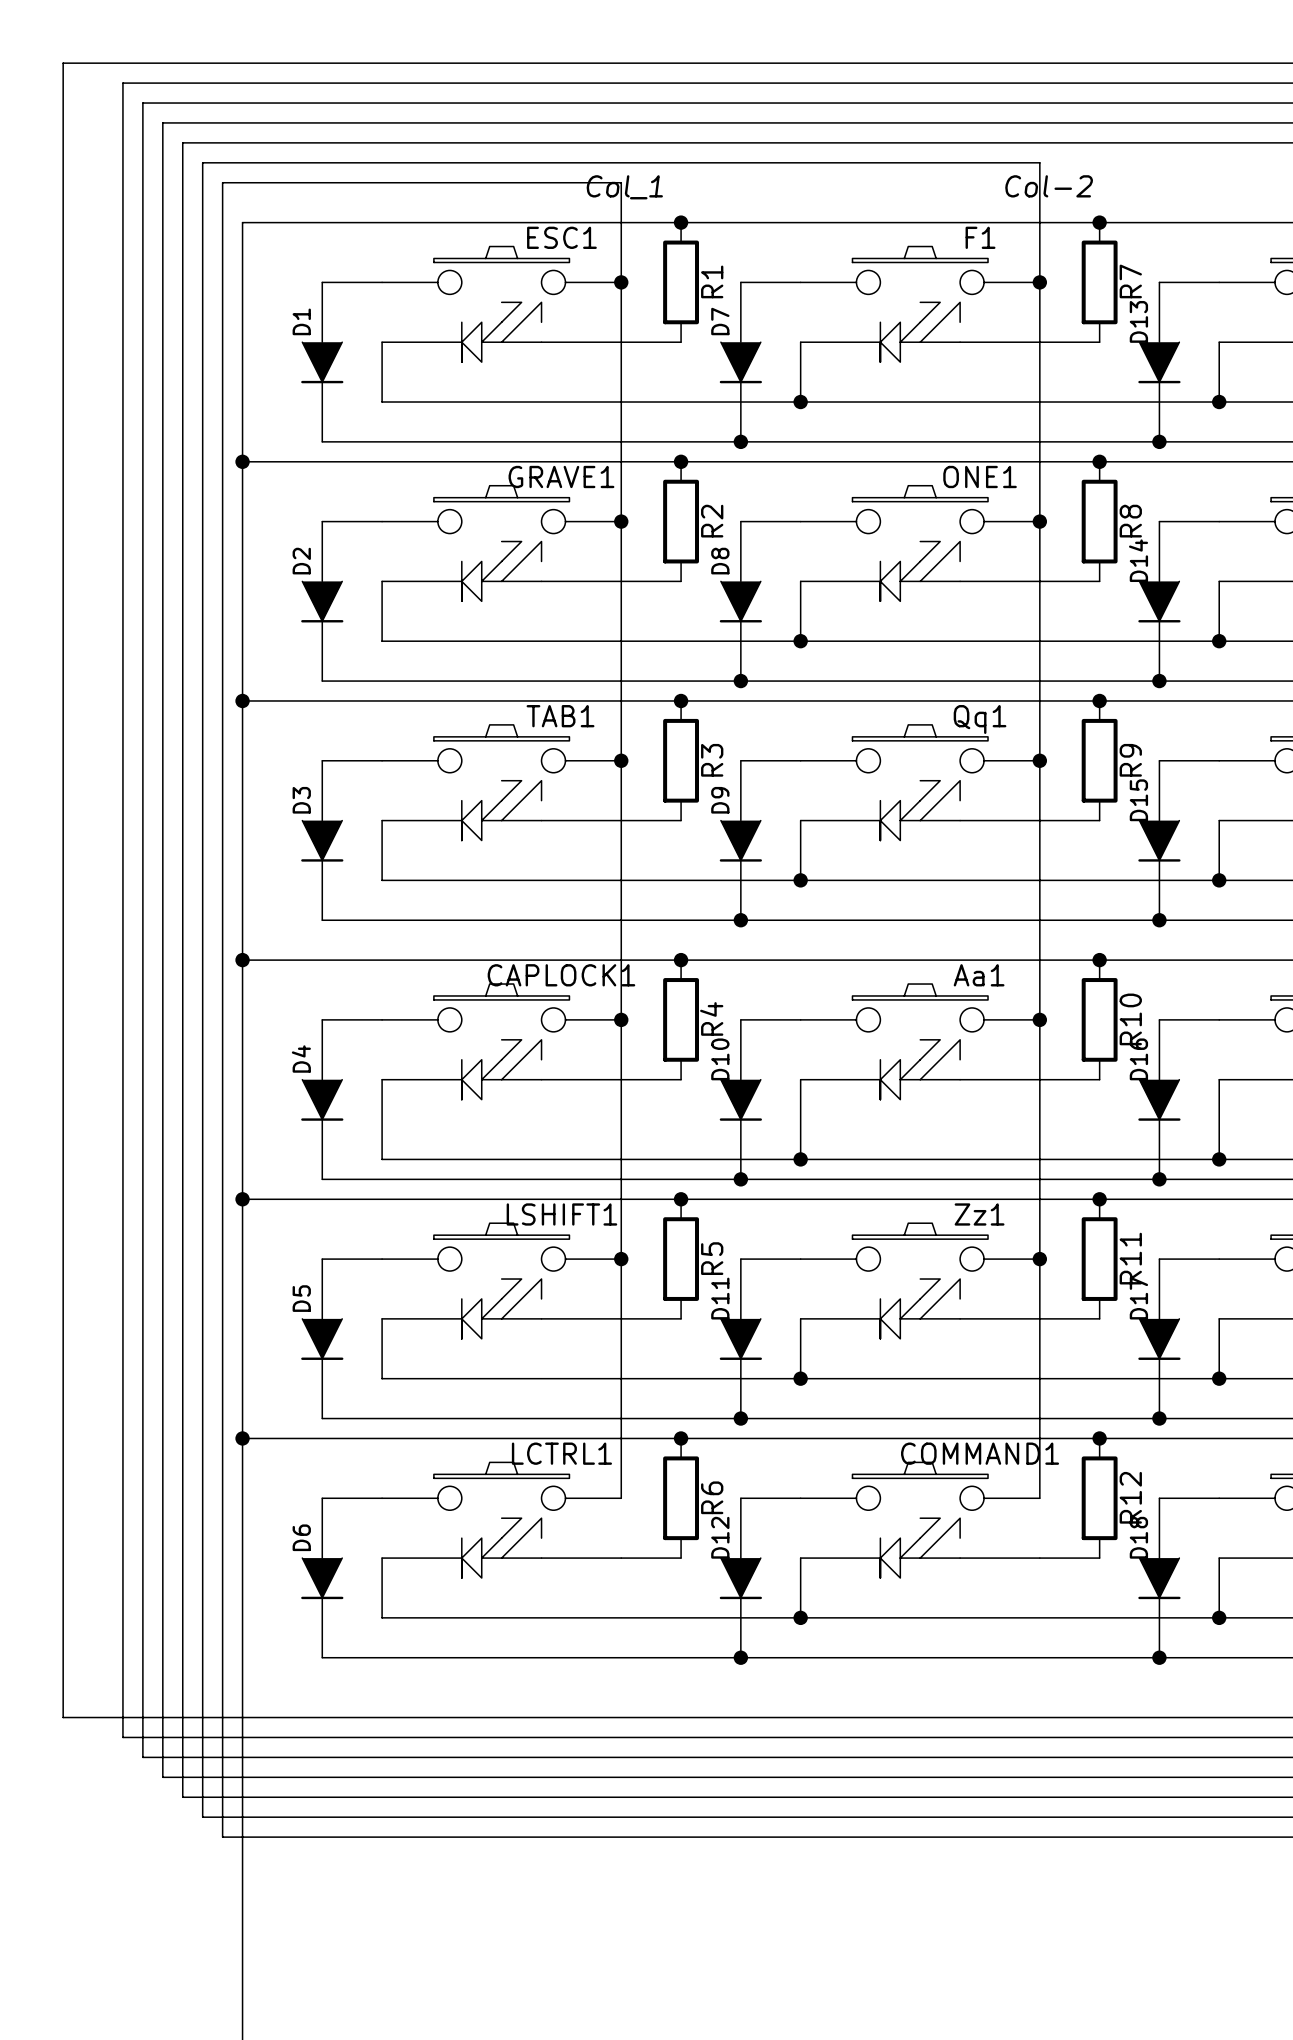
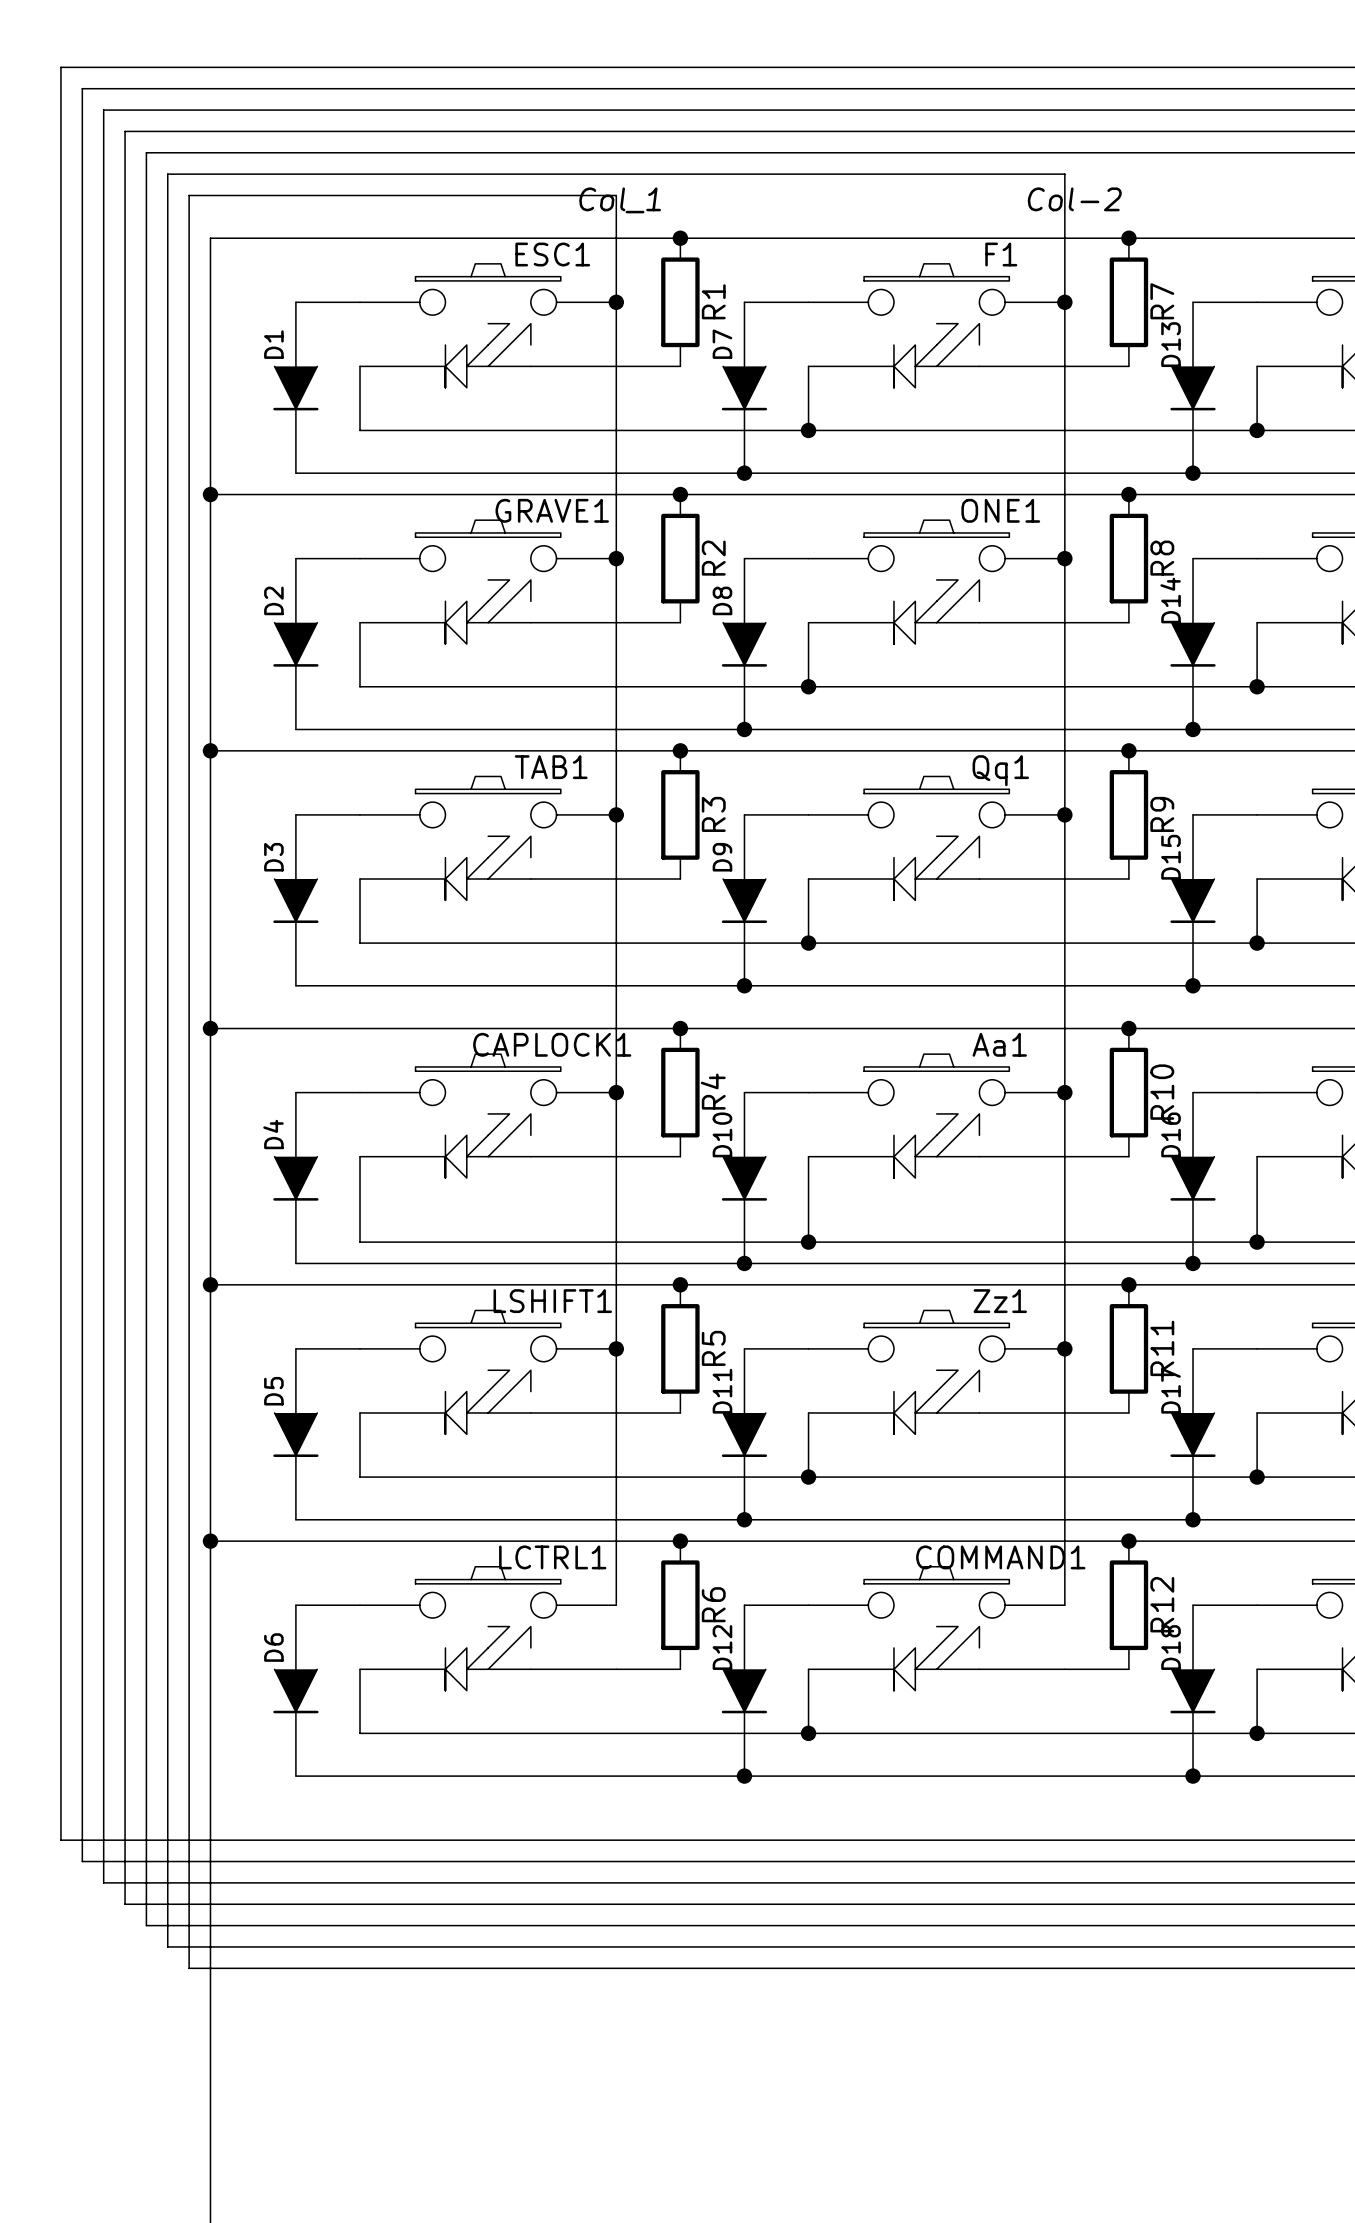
wire: (103, 63) (63, 63) (63, 1717) (103, 1717) -> (60, 67) (60, 1840)

